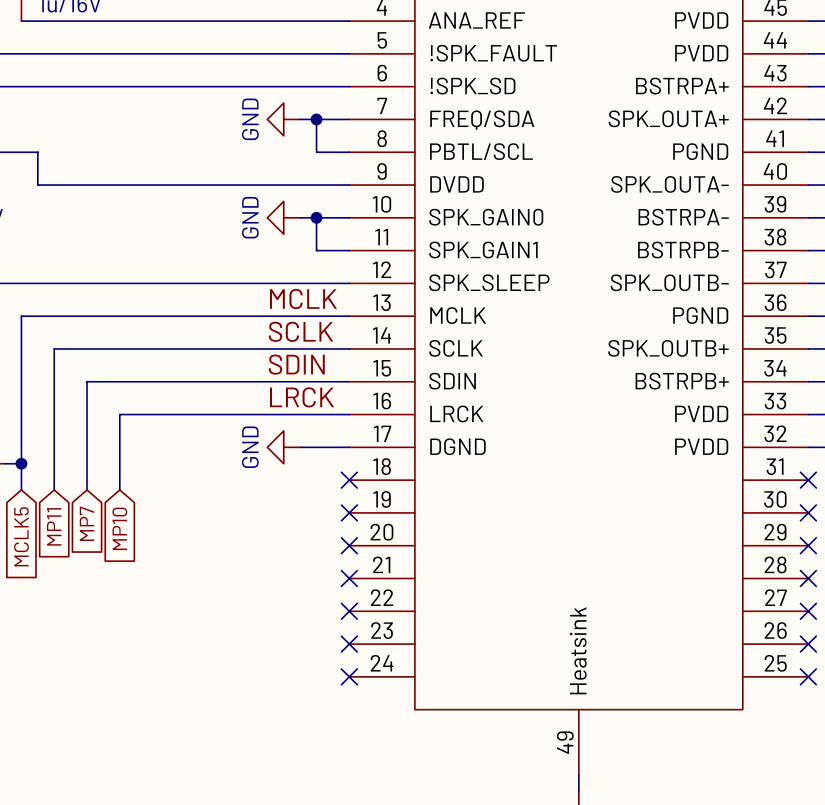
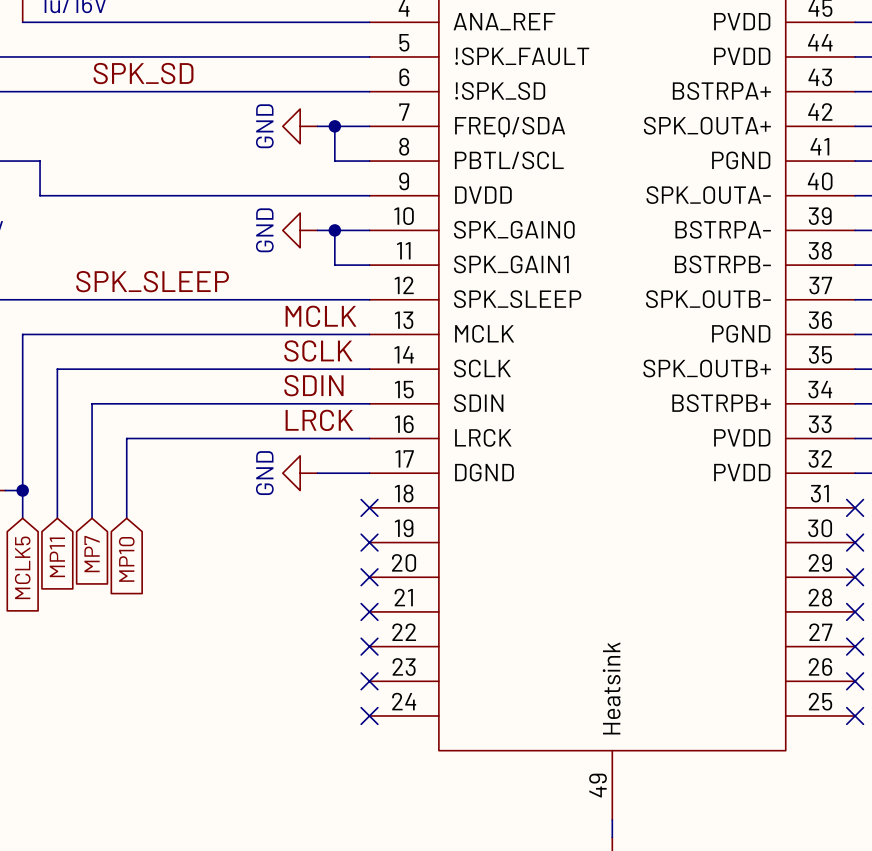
label: none -> SPK_SD (143, 73)
label: none -> SPK_SLEEP (152, 281)

